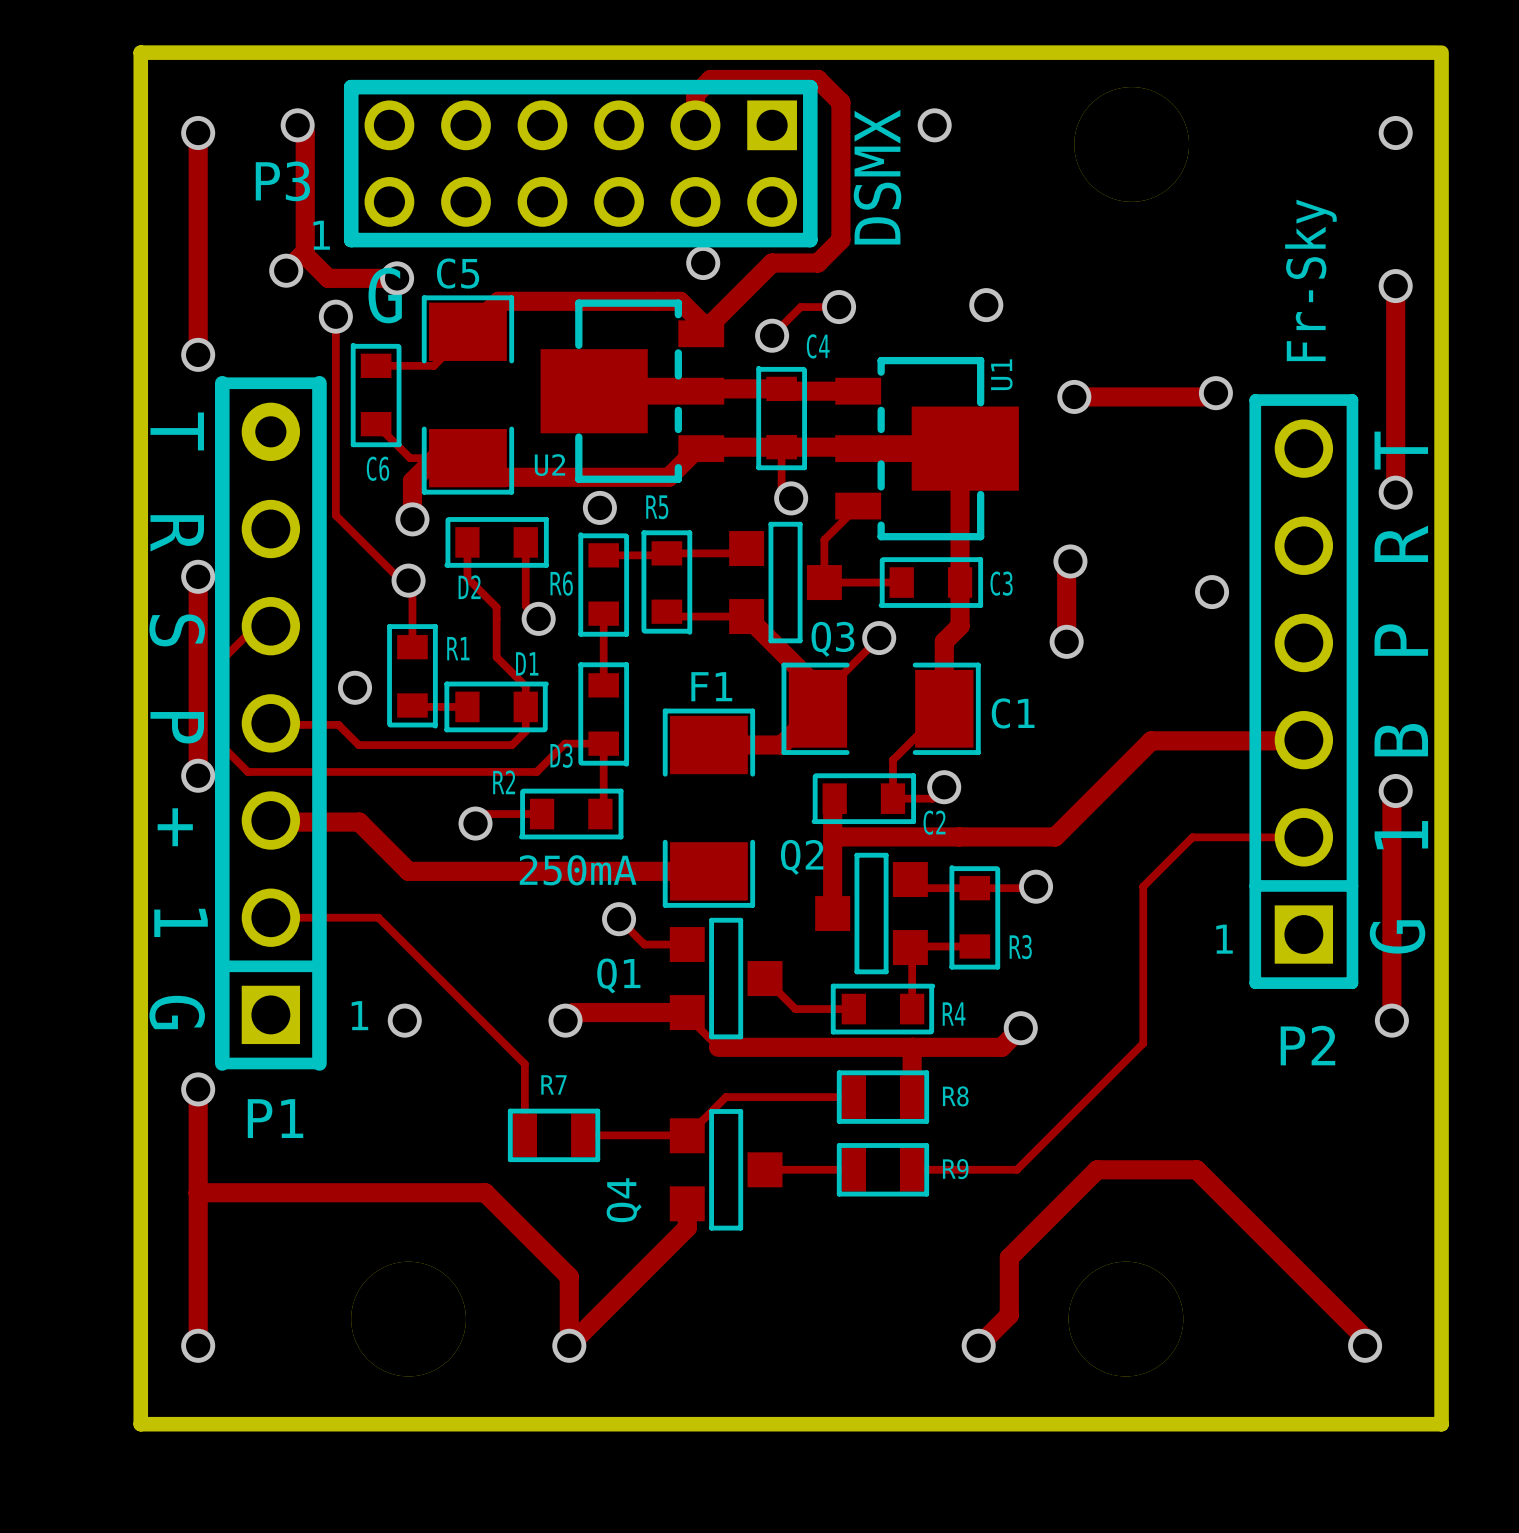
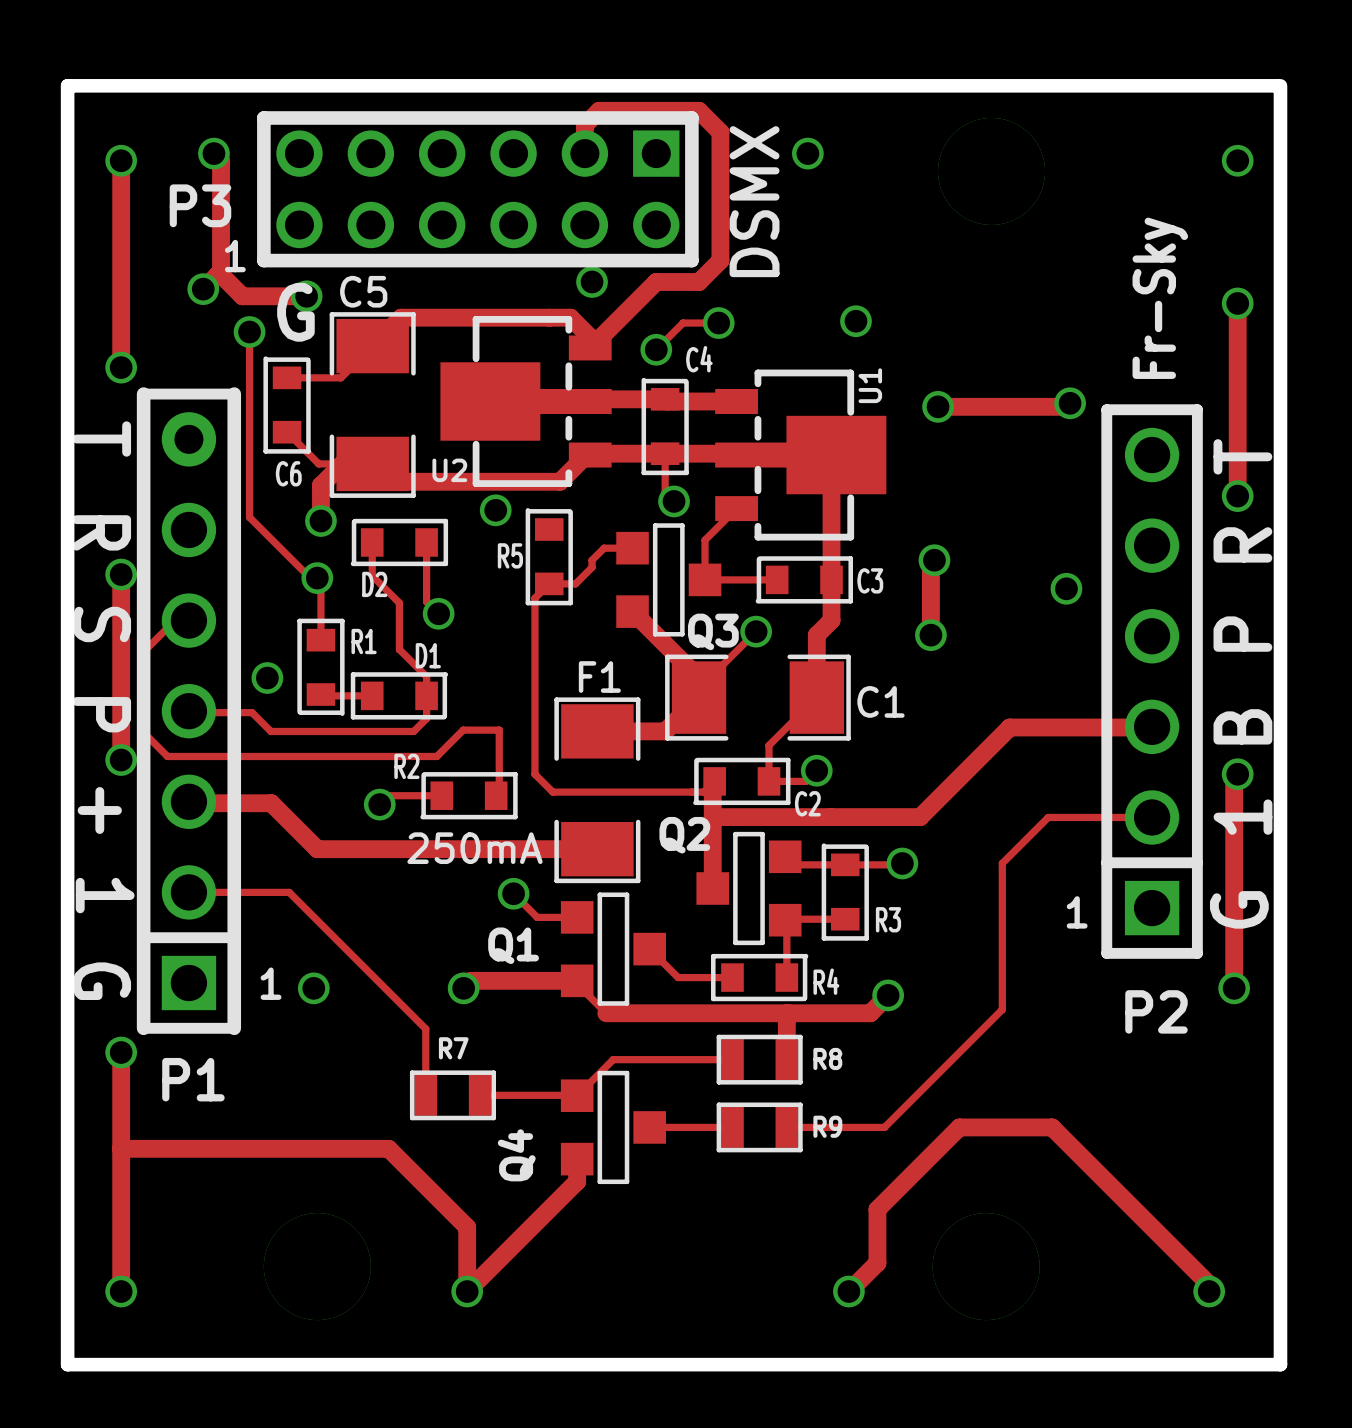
R5 name position: R5 (657, 507) -> R5 (510, 555)
track: (746, 548) (741, 553) (603, 555) (605, 553) -> (632, 548) (604, 548) (592, 560) (592, 567) (575, 583) (549, 583) (534, 598) (534, 774) (552, 792) (703, 792) (712, 783)
R5 rotation: 0° (666, 582) -> 180° (549, 556)
R6: (603, 584) -> none
track: (666, 611) (671, 616) (746, 616) -> none
track: (603, 613) (603, 685) -> none
D3: (603, 714) -> none

